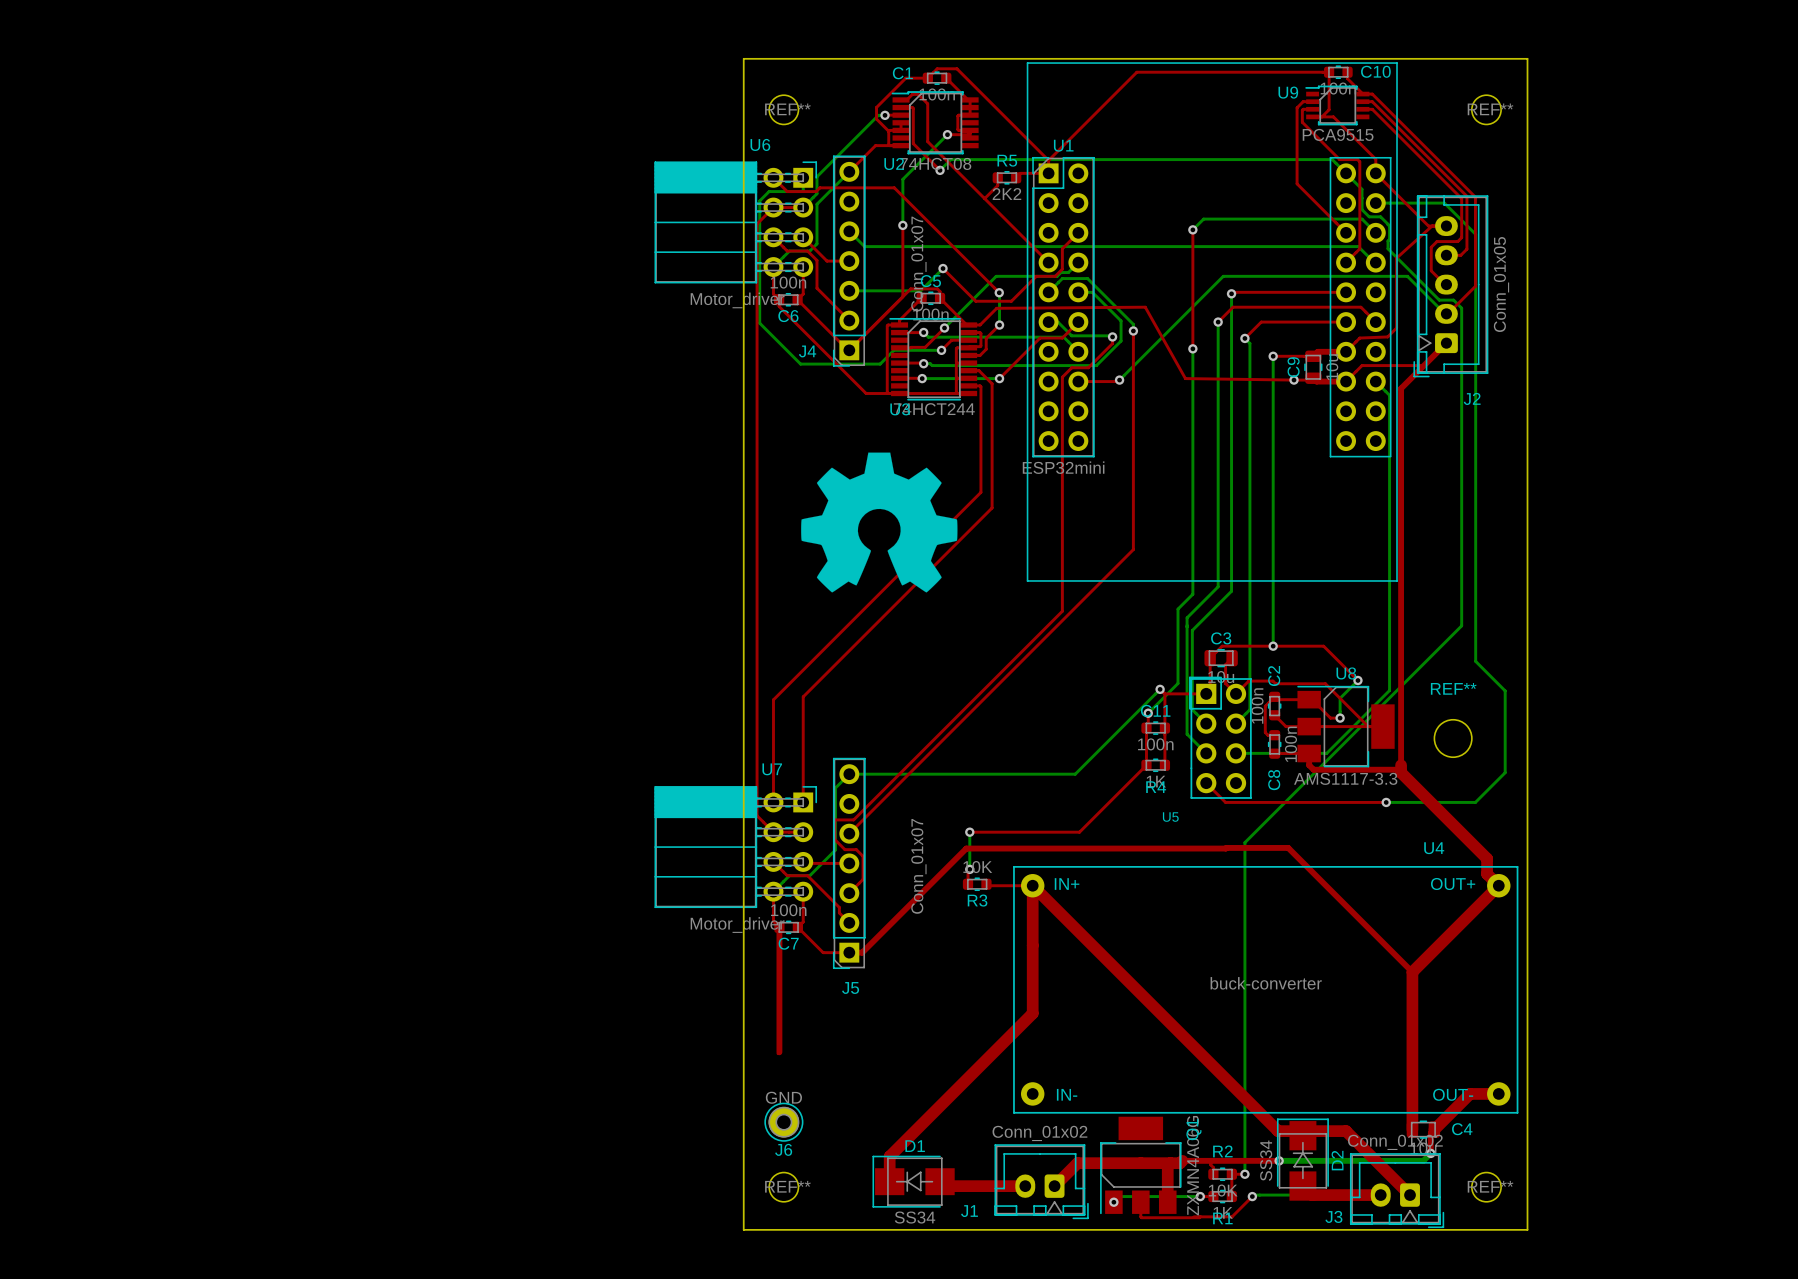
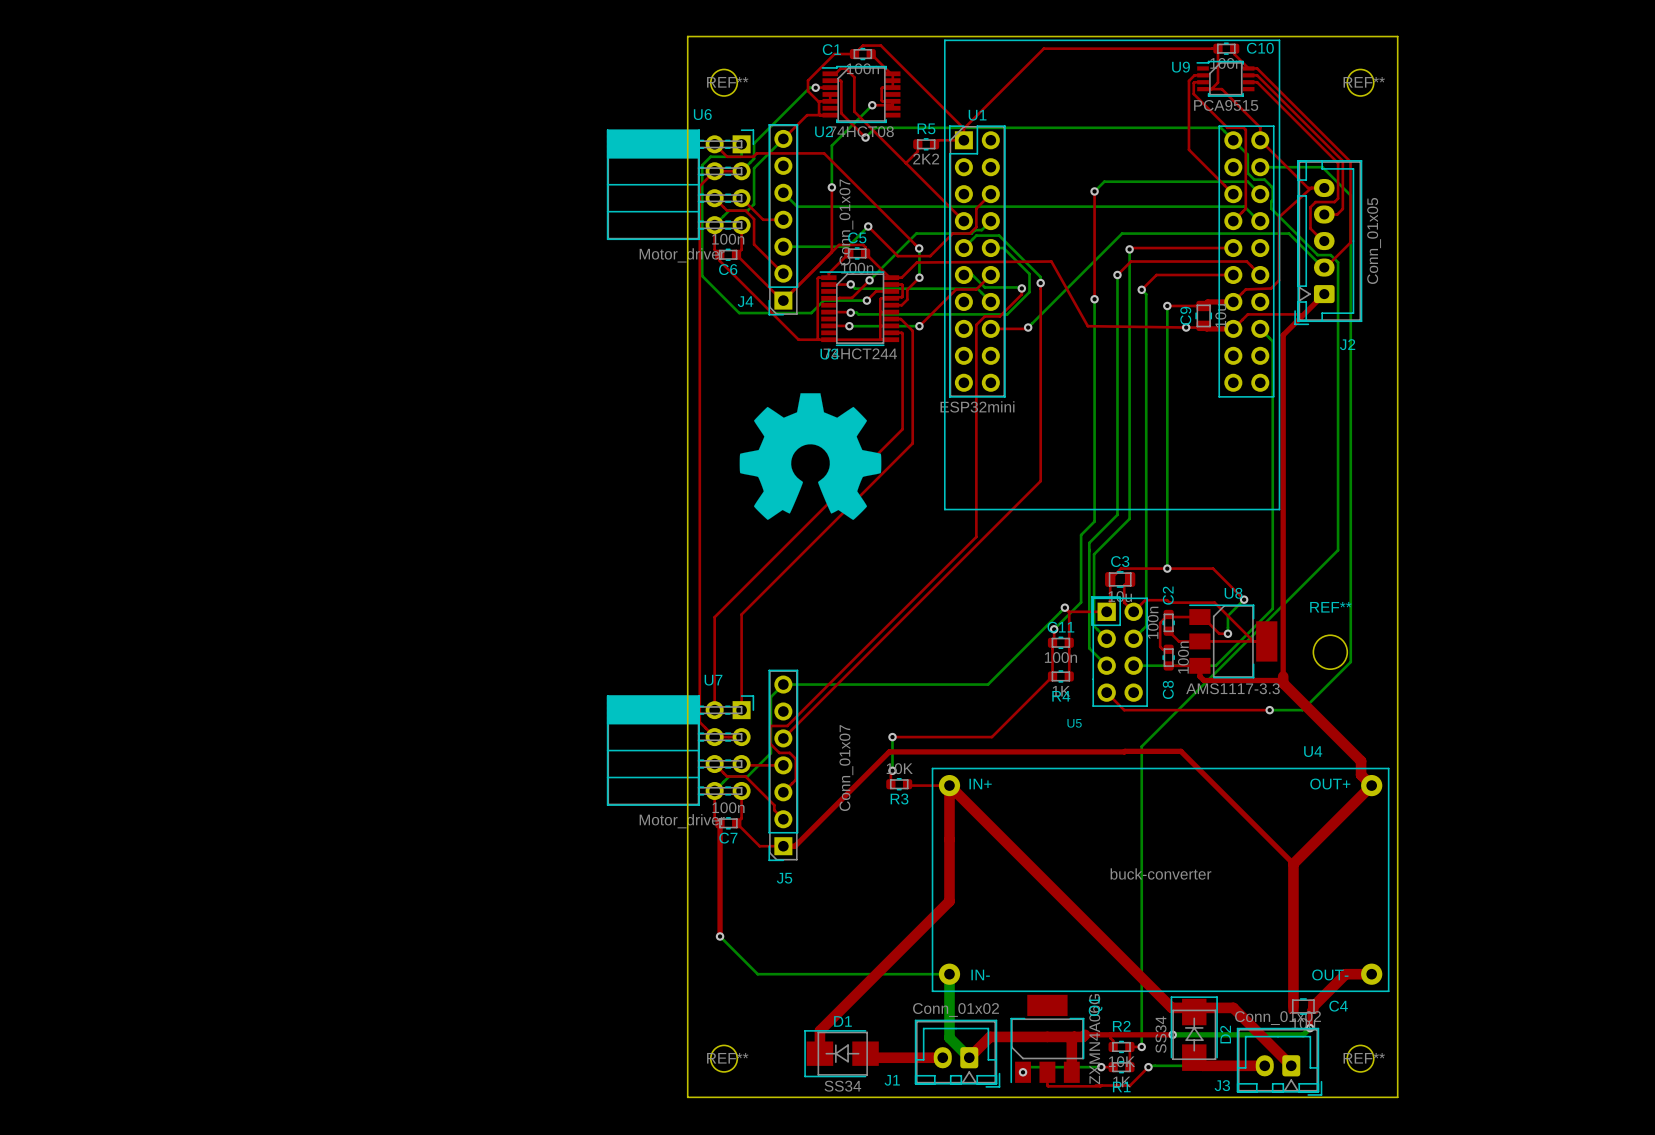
bottom track: (1475, 661) (1505, 690) (1505, 772) (1475, 802) (1422, 802) -> (1350, 582) (1350, 662) (1302, 710)
bottom track: none -> (720, 936) (757, 974) (949, 974) (949, 1037) (969, 1057)
via: none -> (720, 936)
J6: GND (783, 1122) -> none

